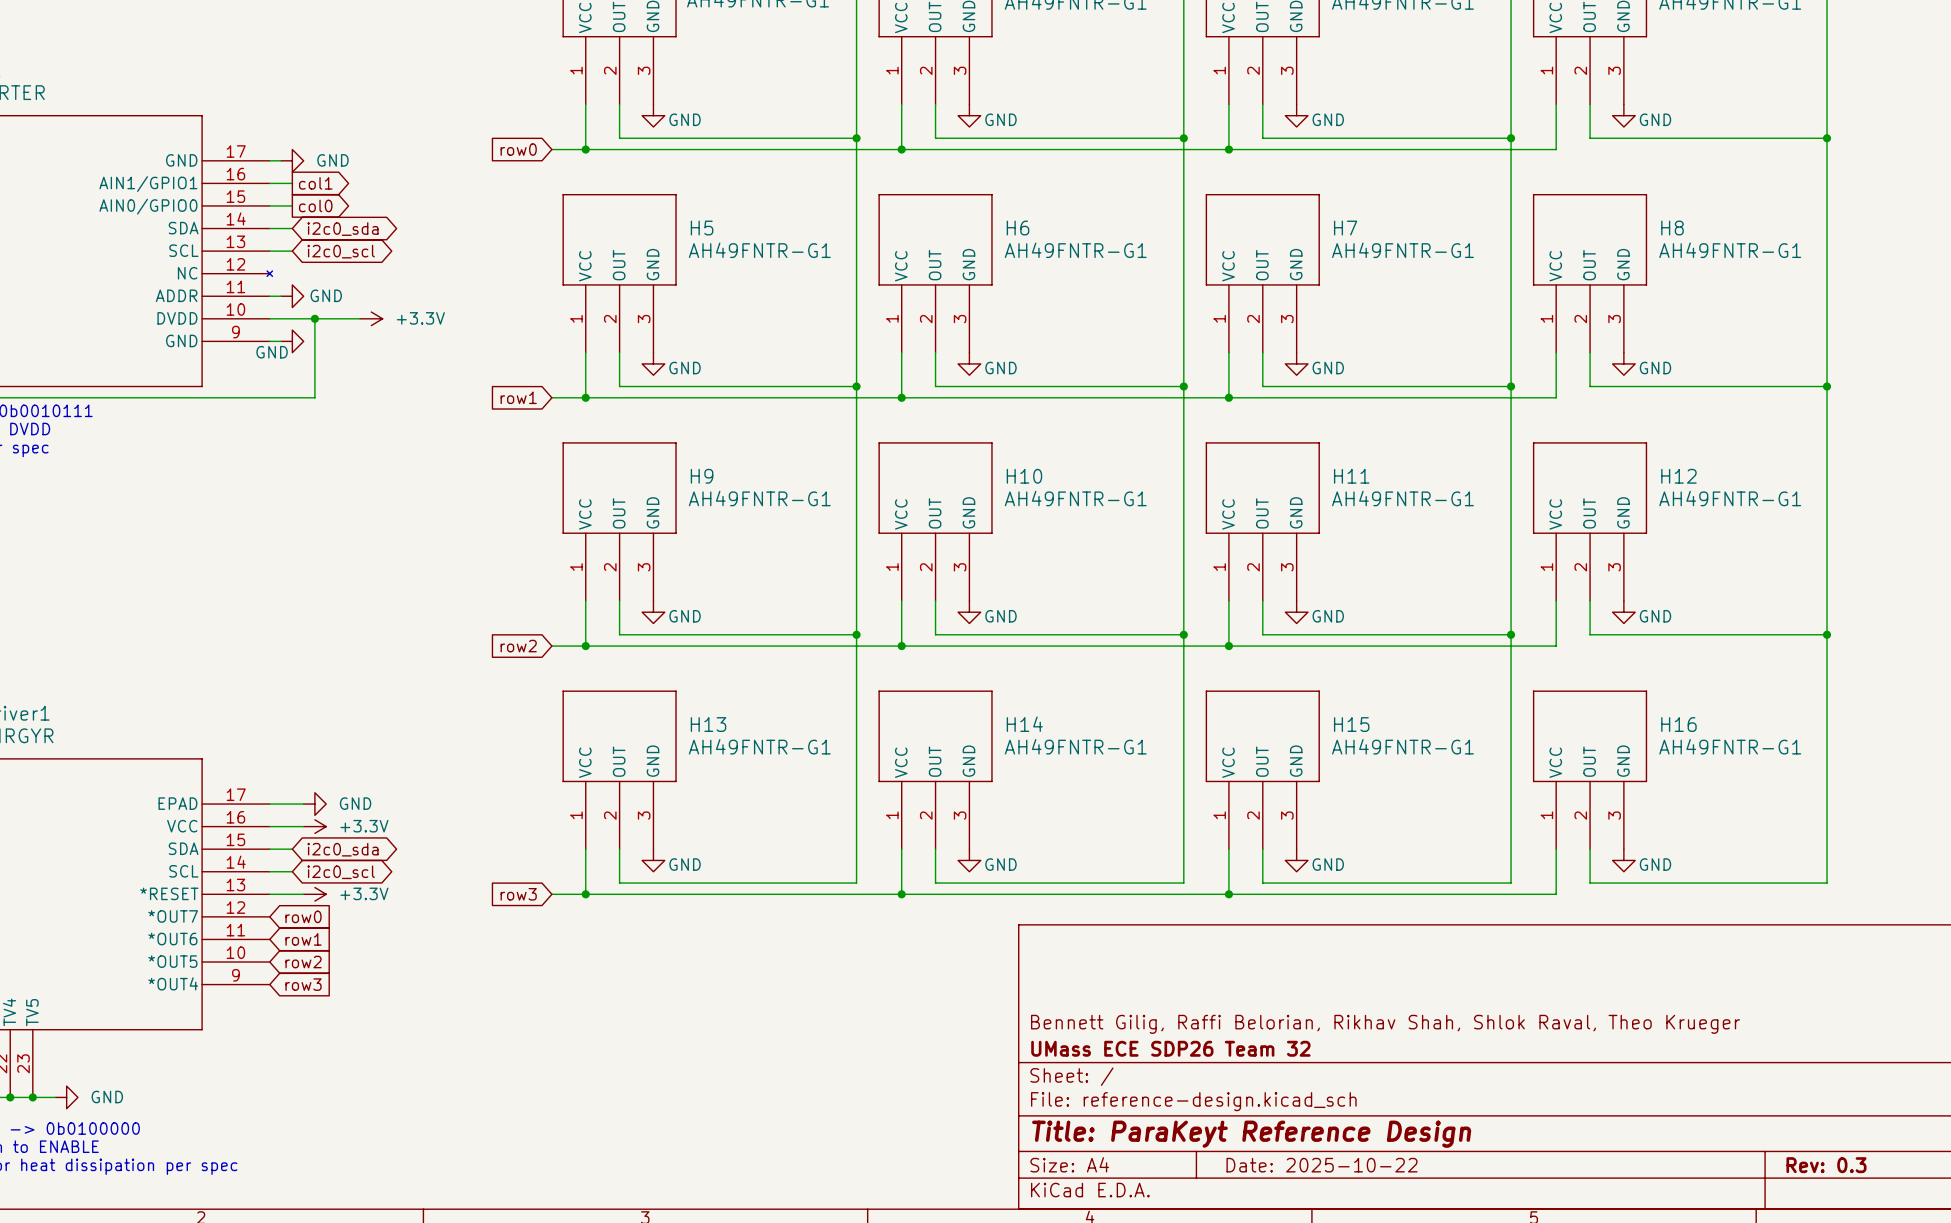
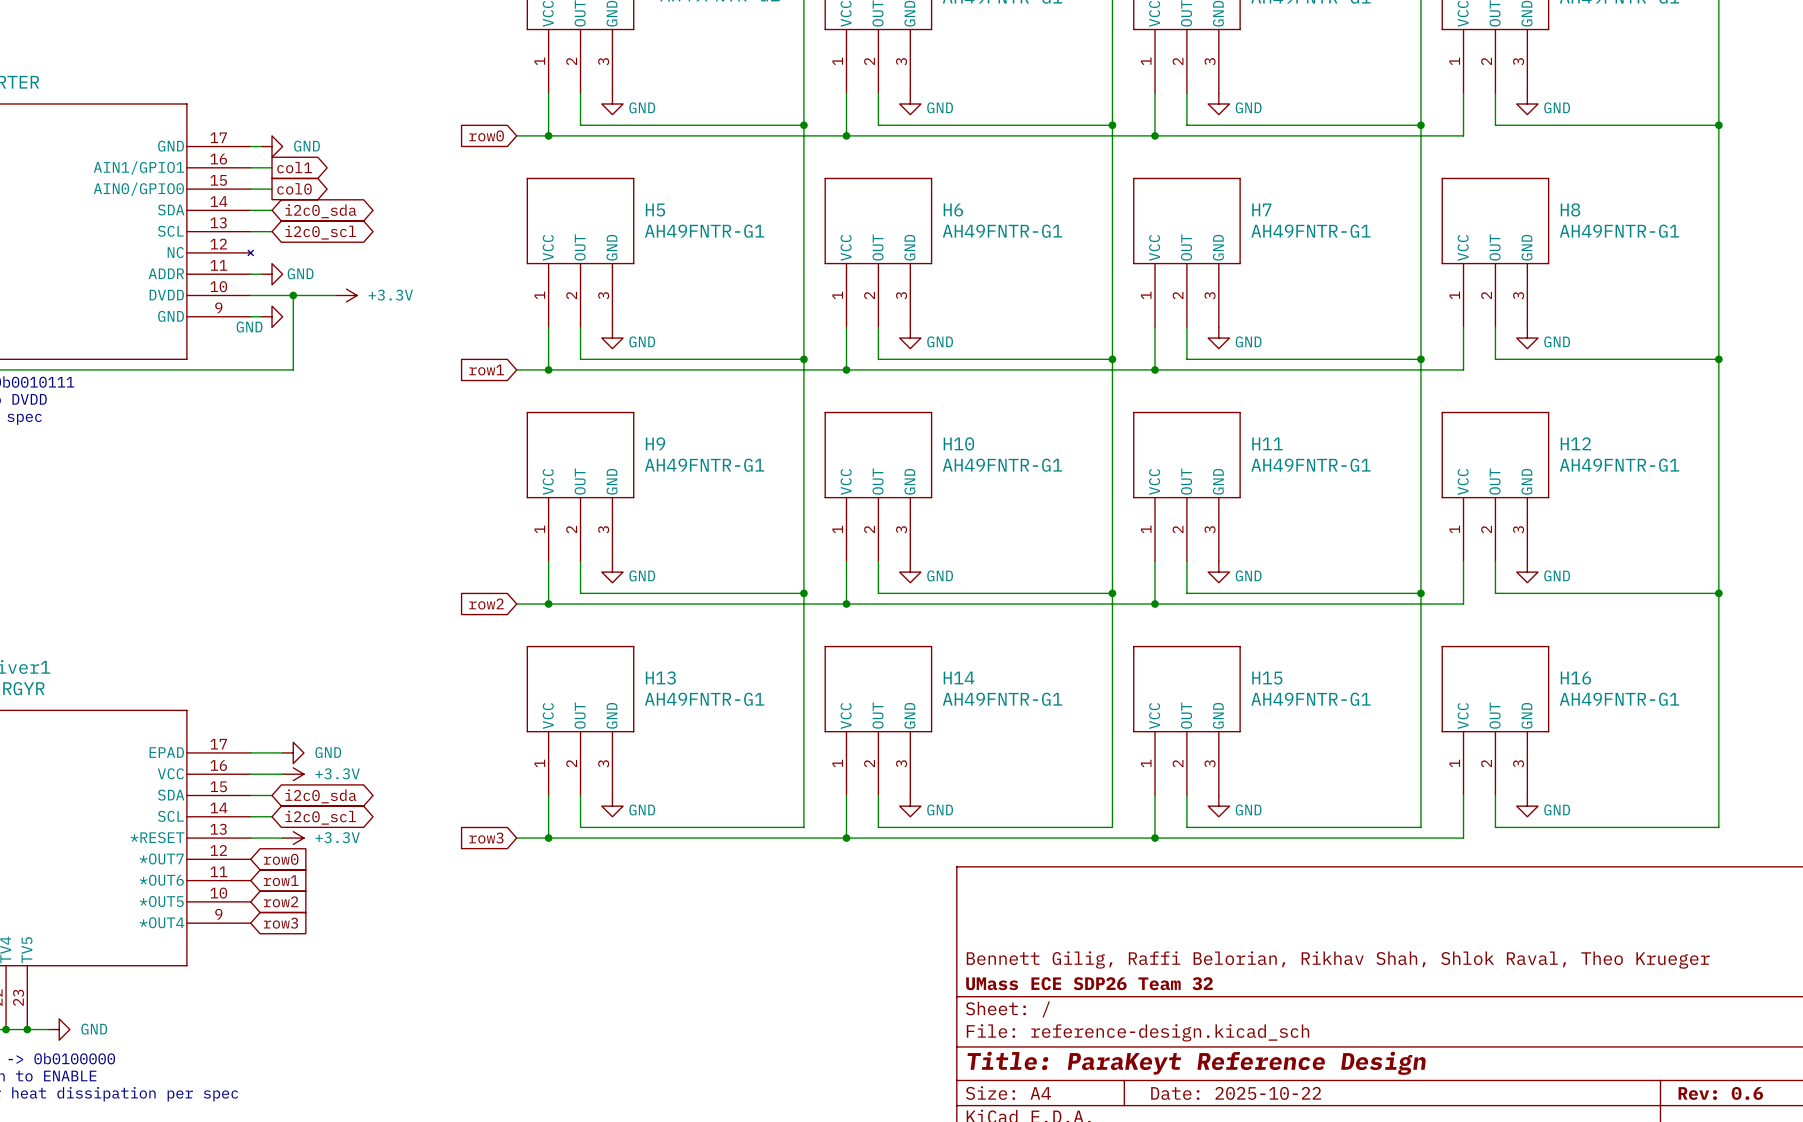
title block: Rev: 0.3 (1826, 1165) -> Rev: 0.6 (1720, 1093)

